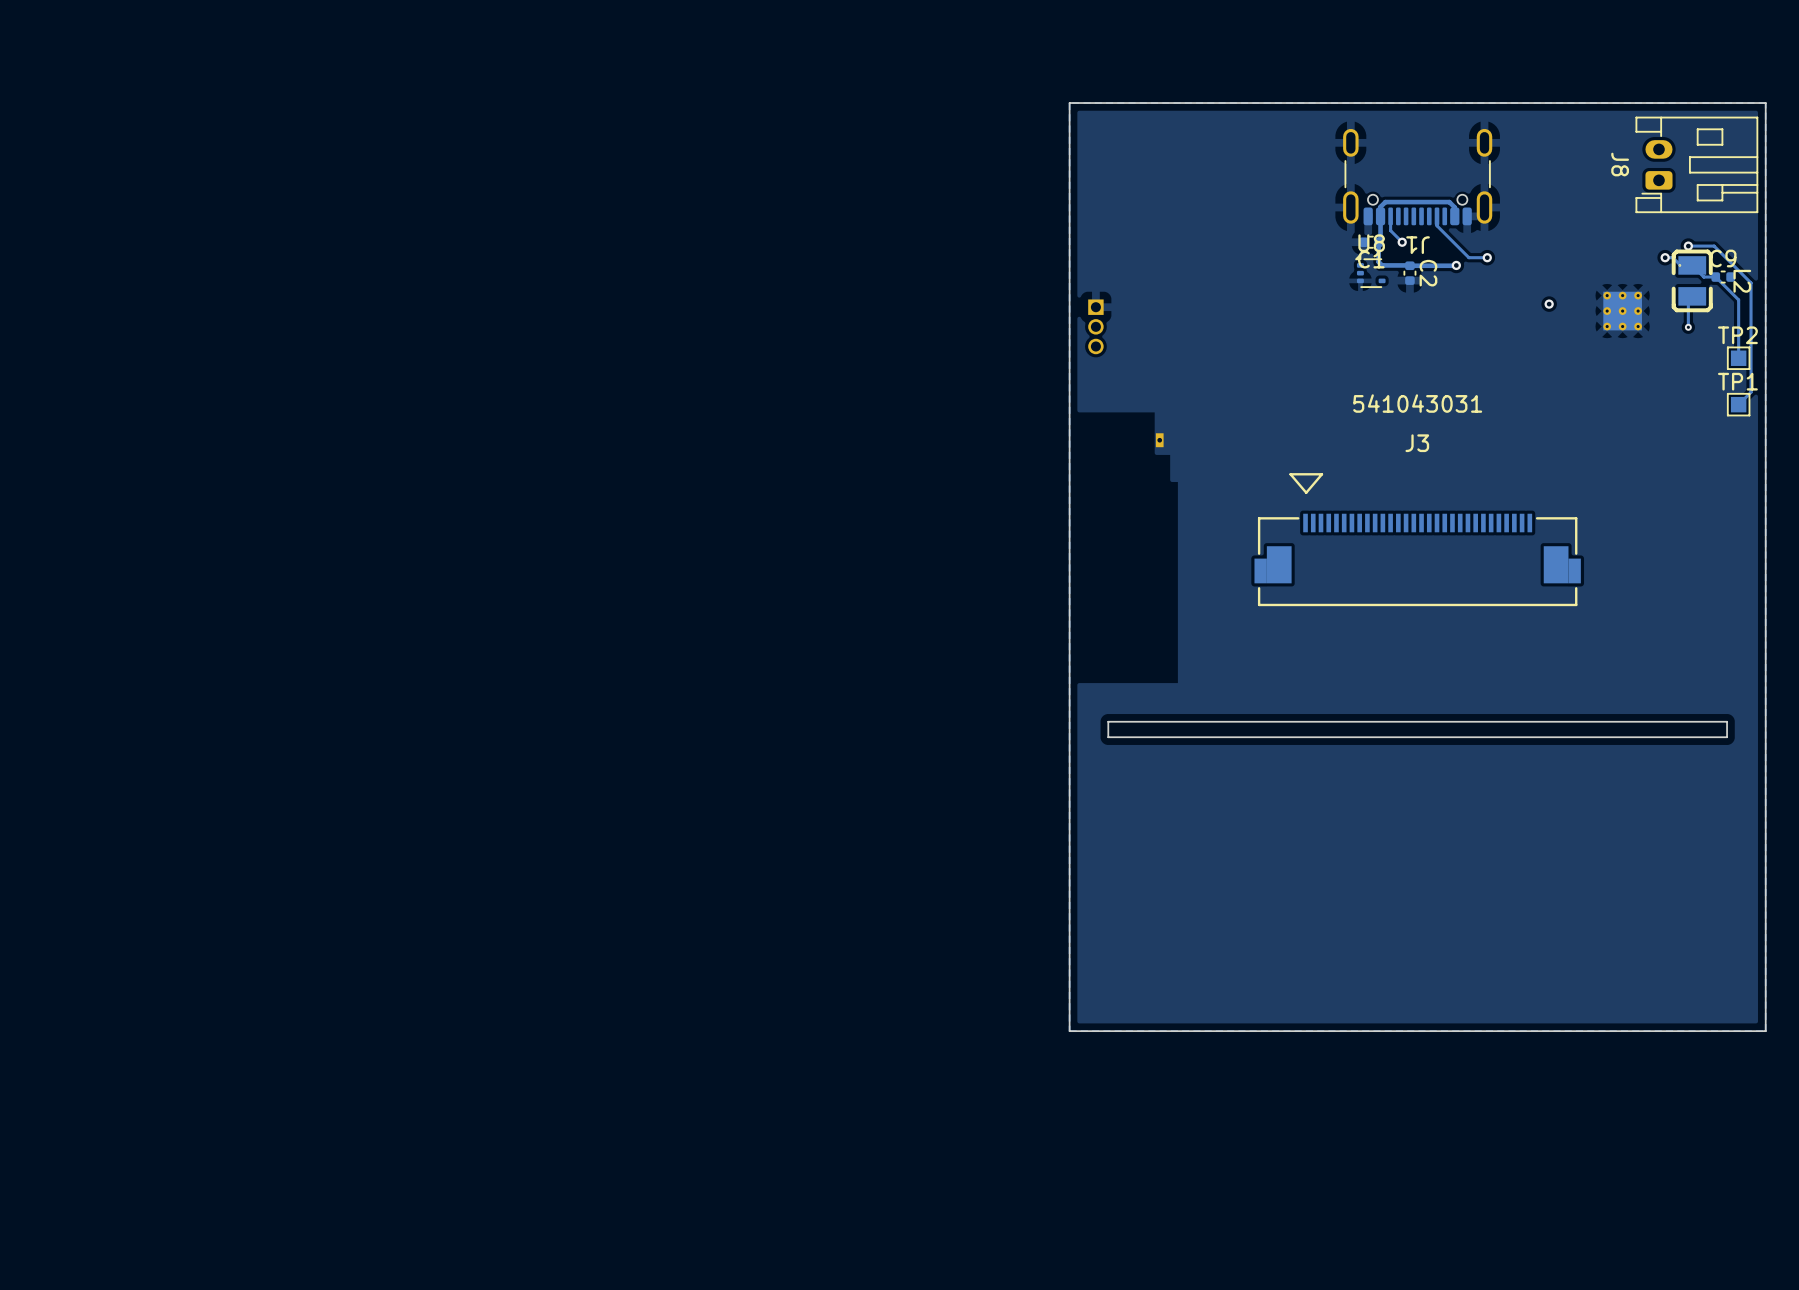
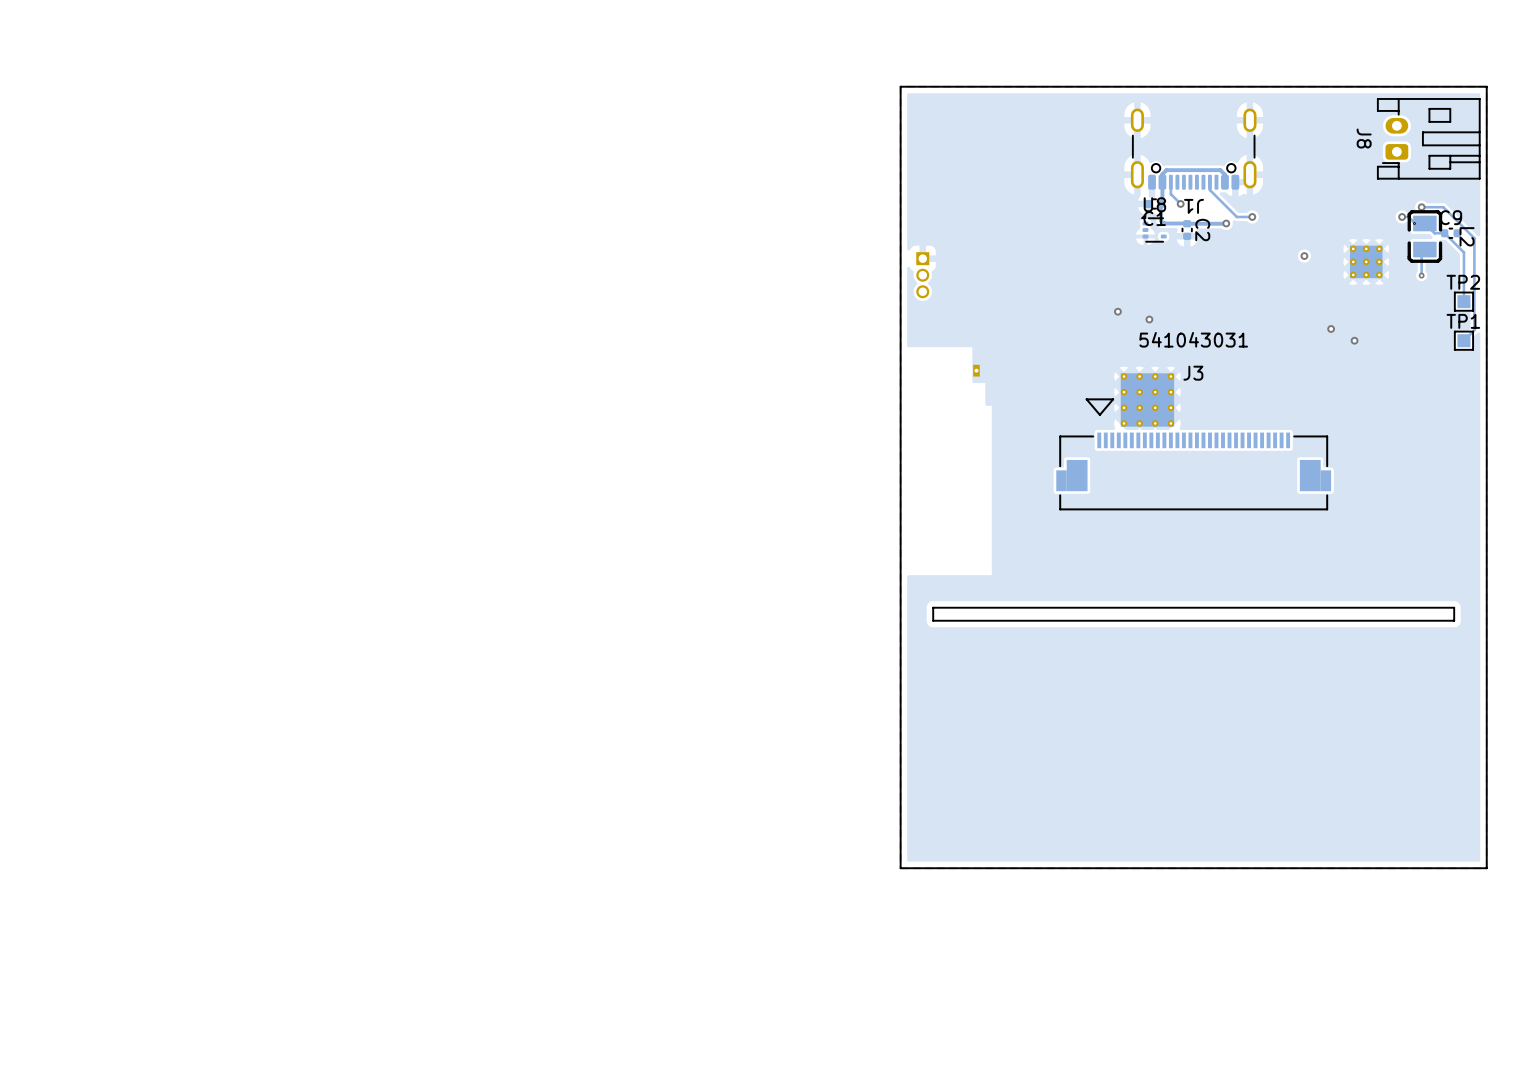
via: none -> (1117, 311)
via: none -> (1149, 319)
via: none -> (1331, 328)
via: none -> (1354, 340)
part: none -> (1147, 399)

